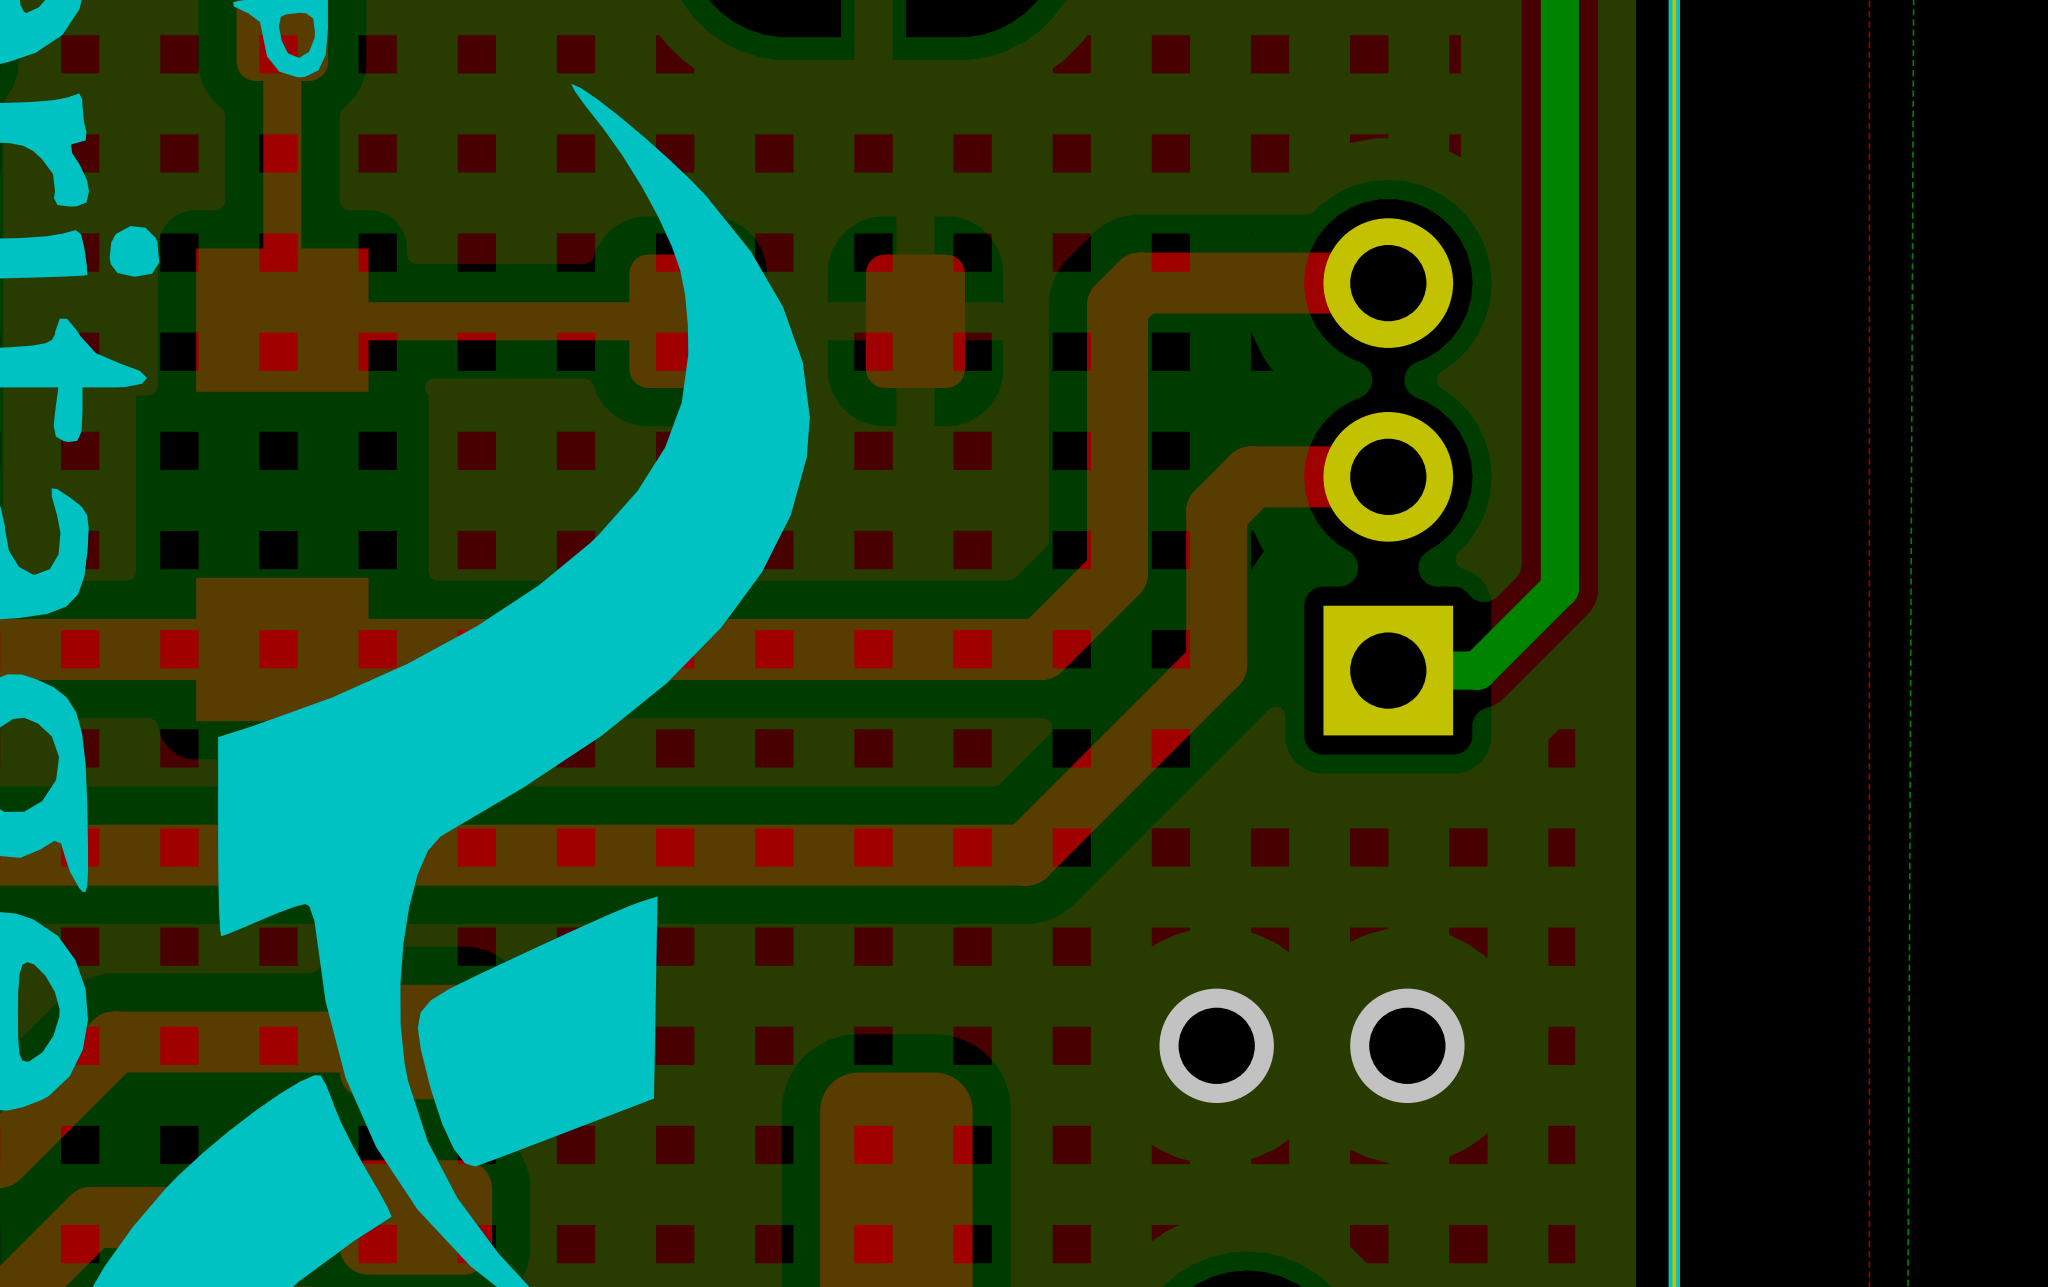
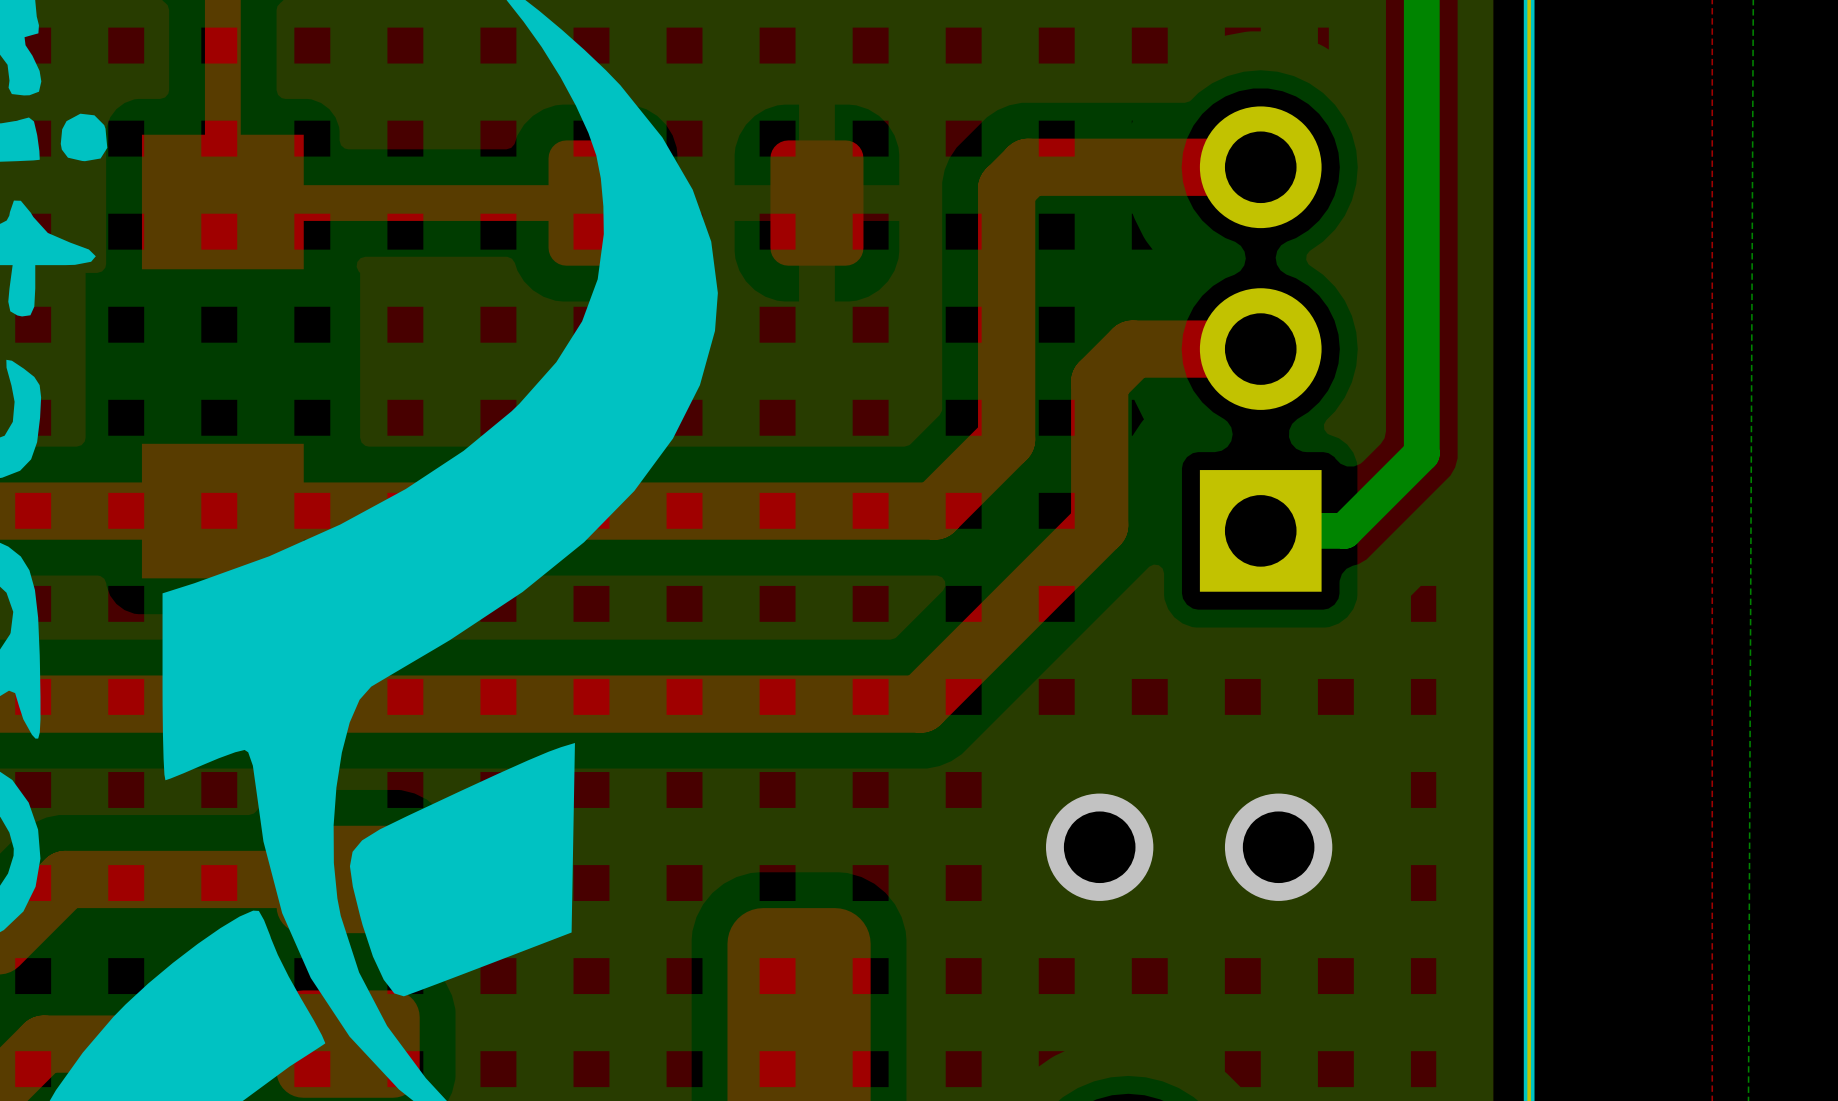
via position: (1216, 1045) -> (1099, 847)
via position: (1407, 1045) -> (1278, 847)

